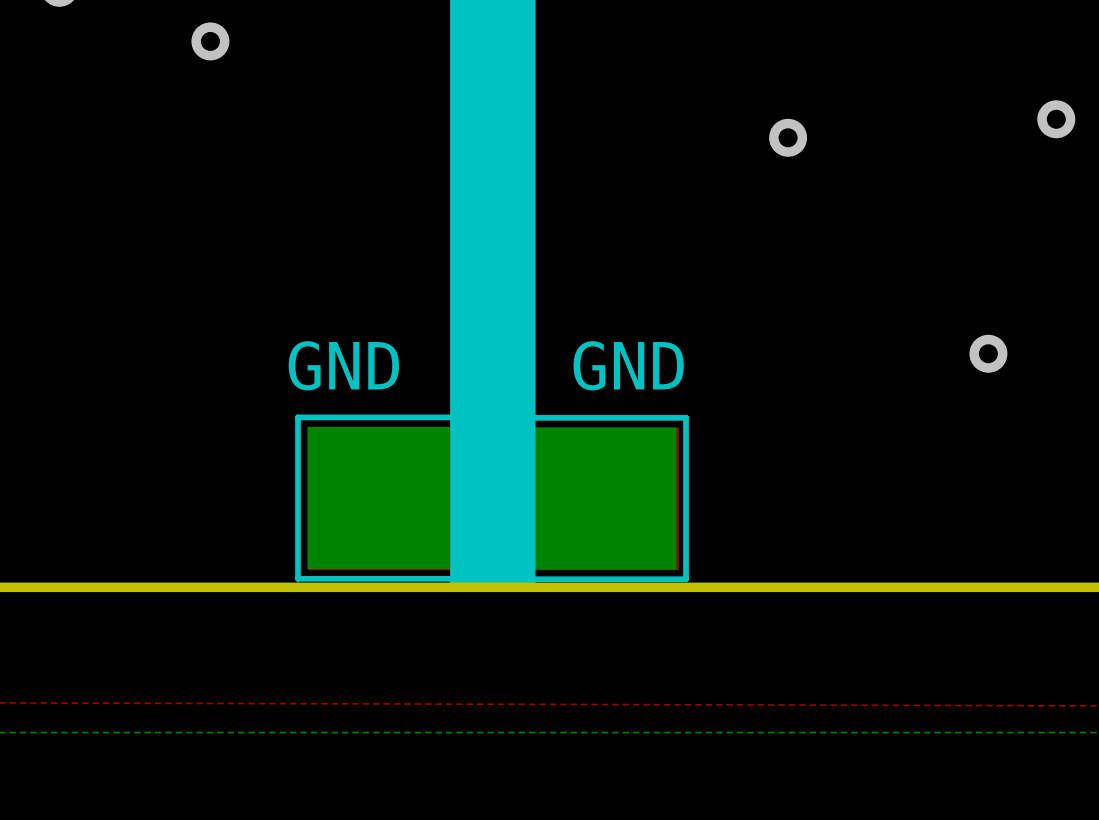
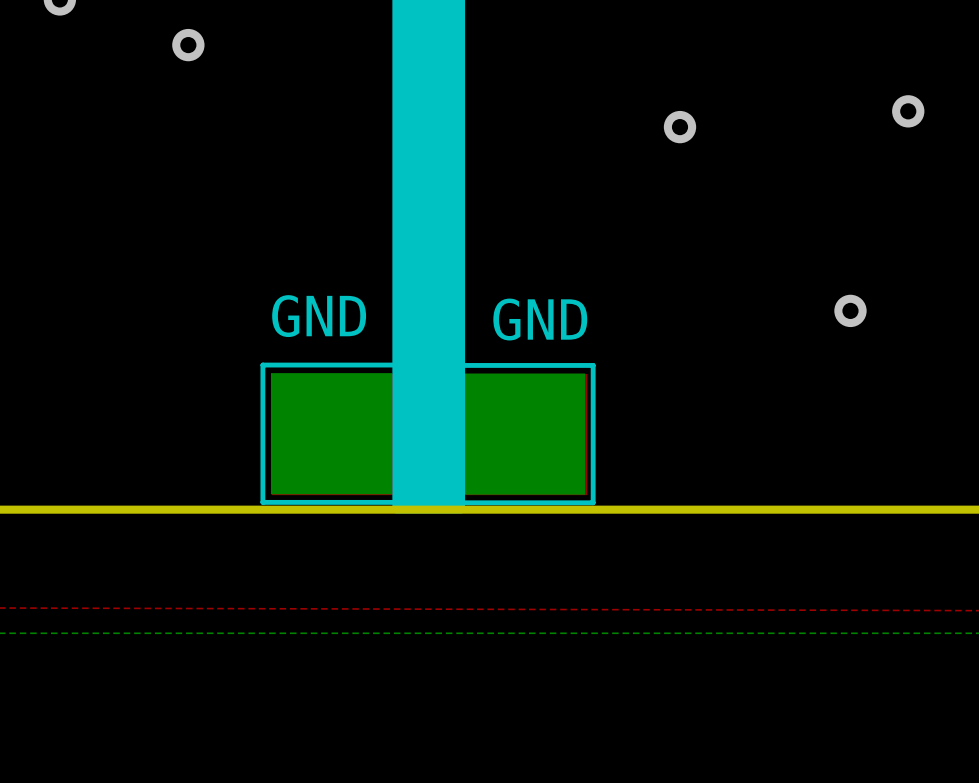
GND name: none -> GND (319, 316)
GND name: none -> GND (540, 319)
text: GND (343, 365) -> none
text: GND (628, 365) -> none

